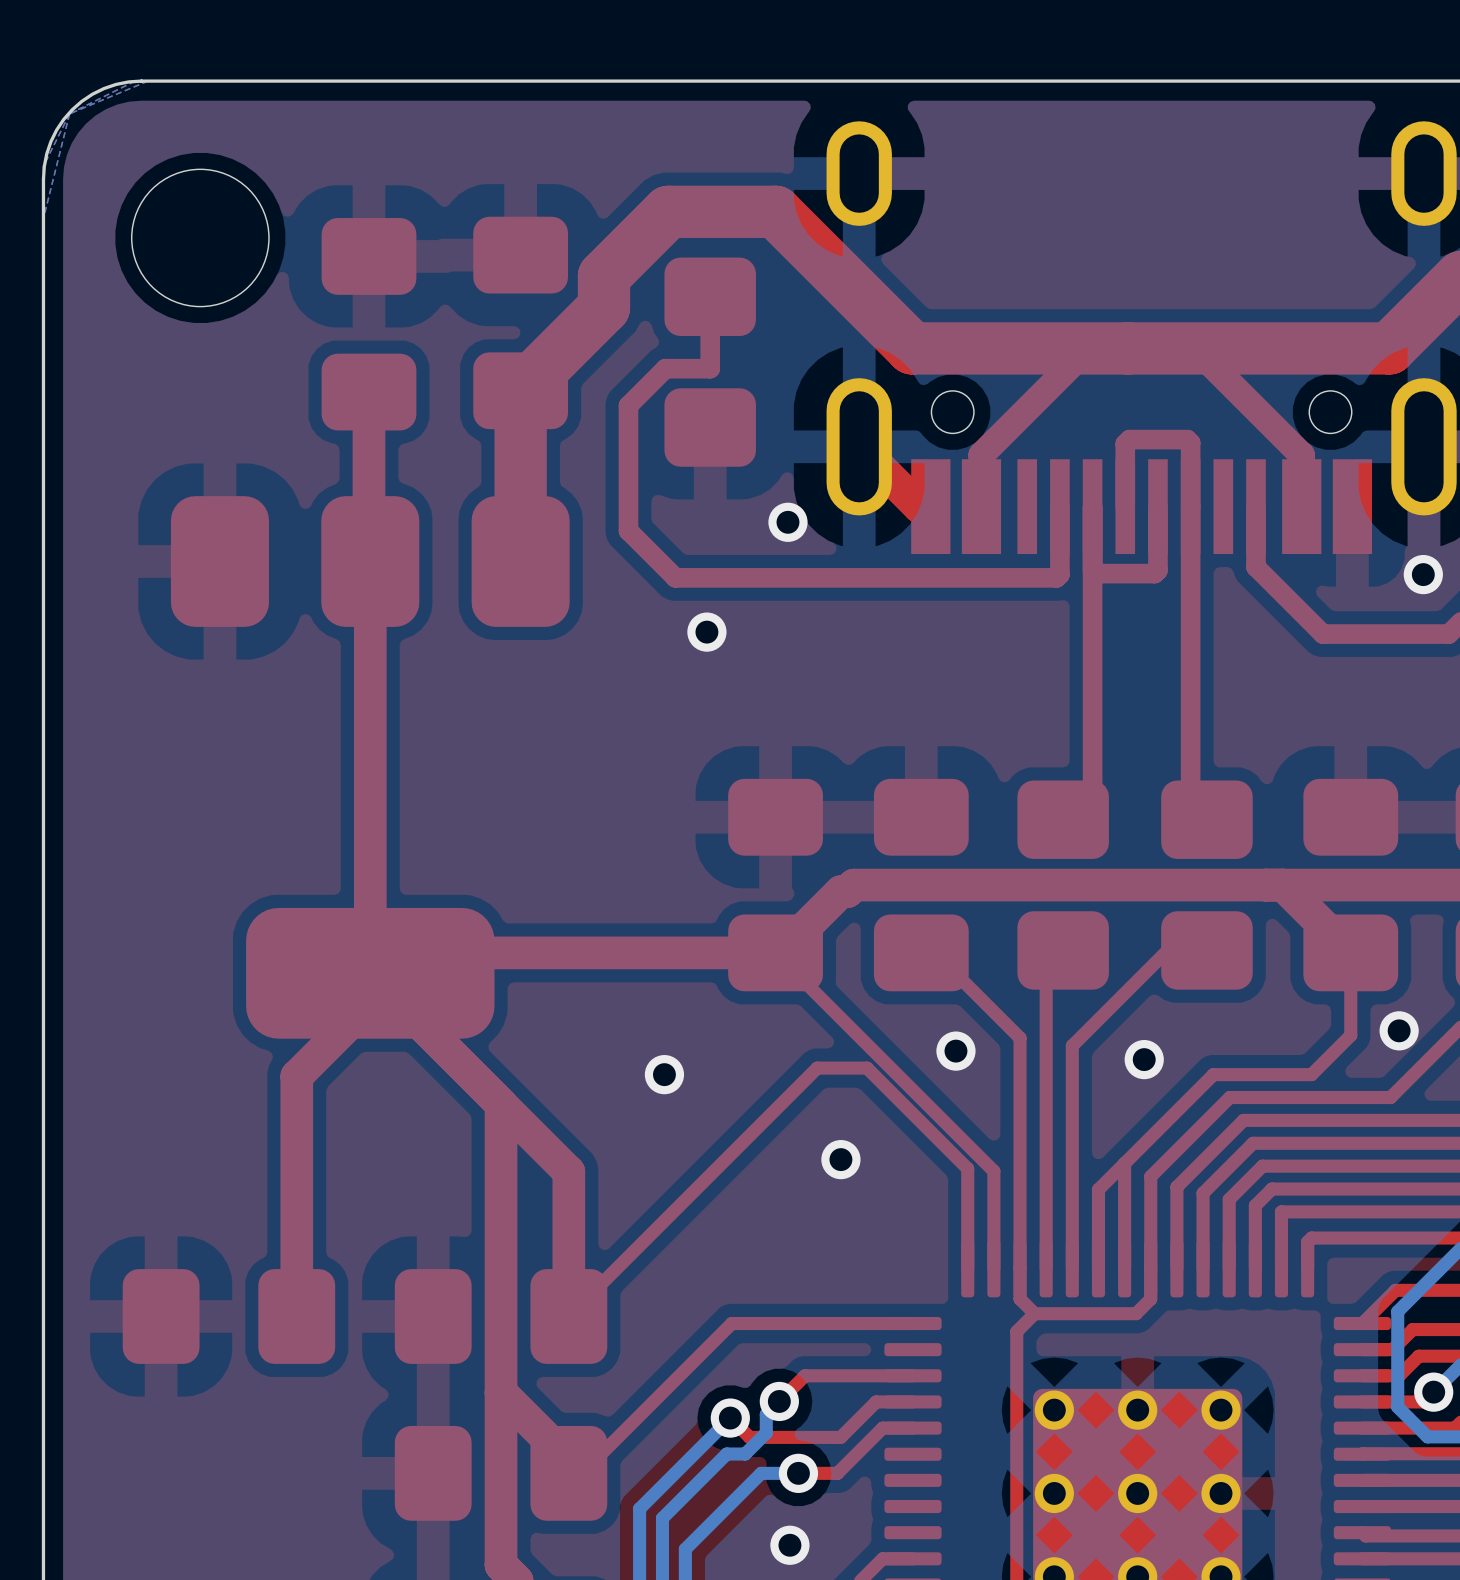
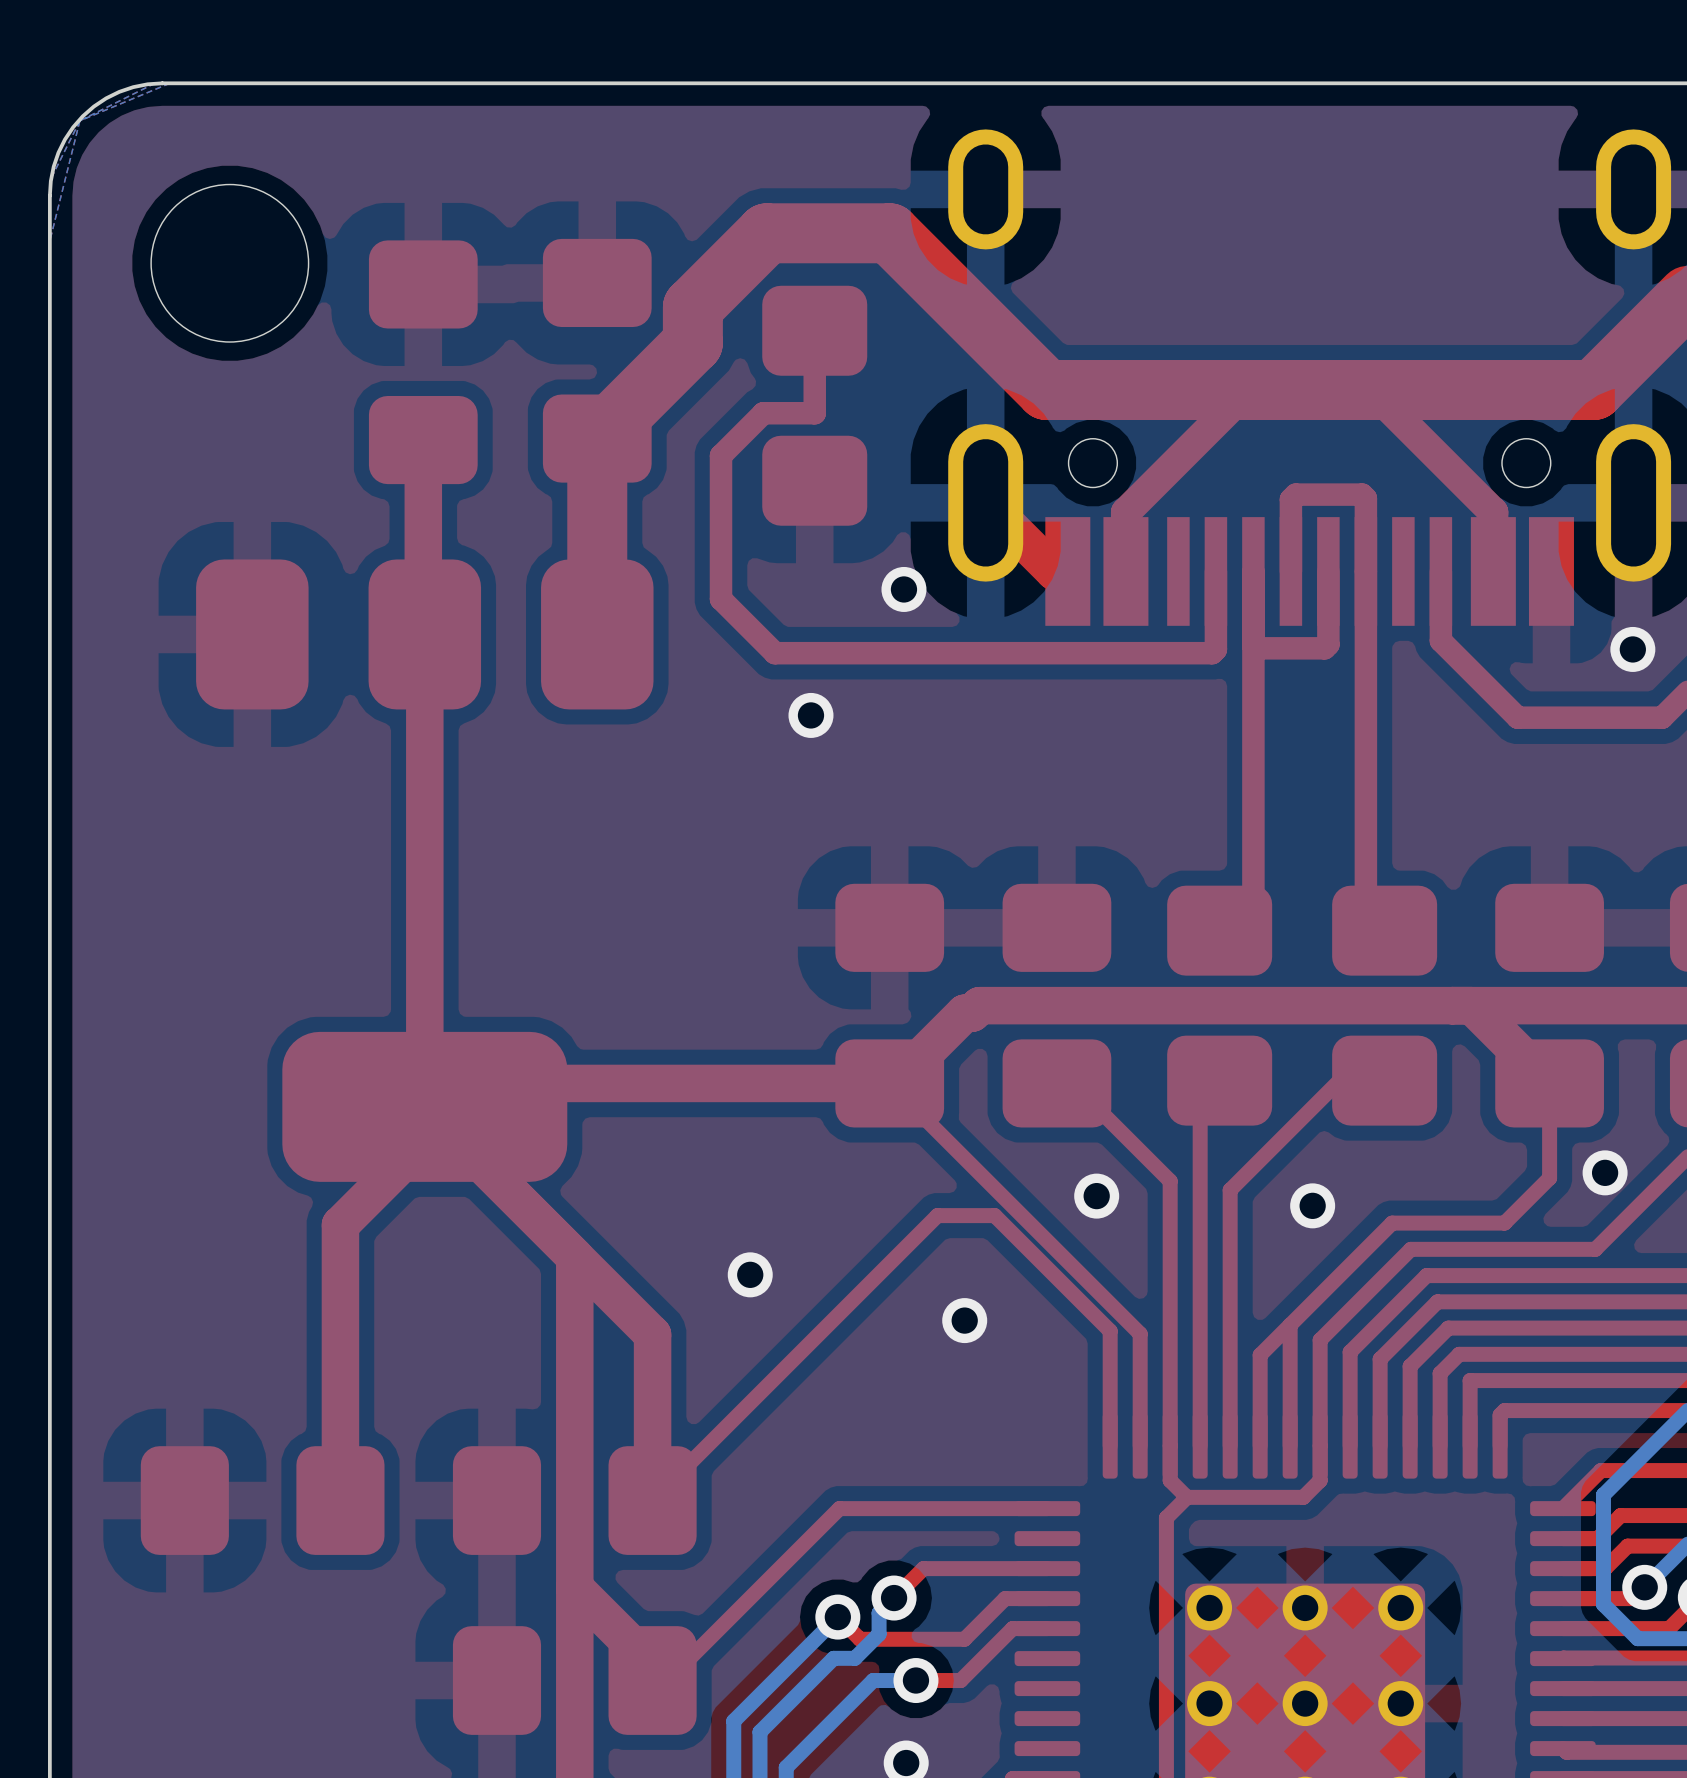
via position: (664, 1074) -> (750, 1274)

